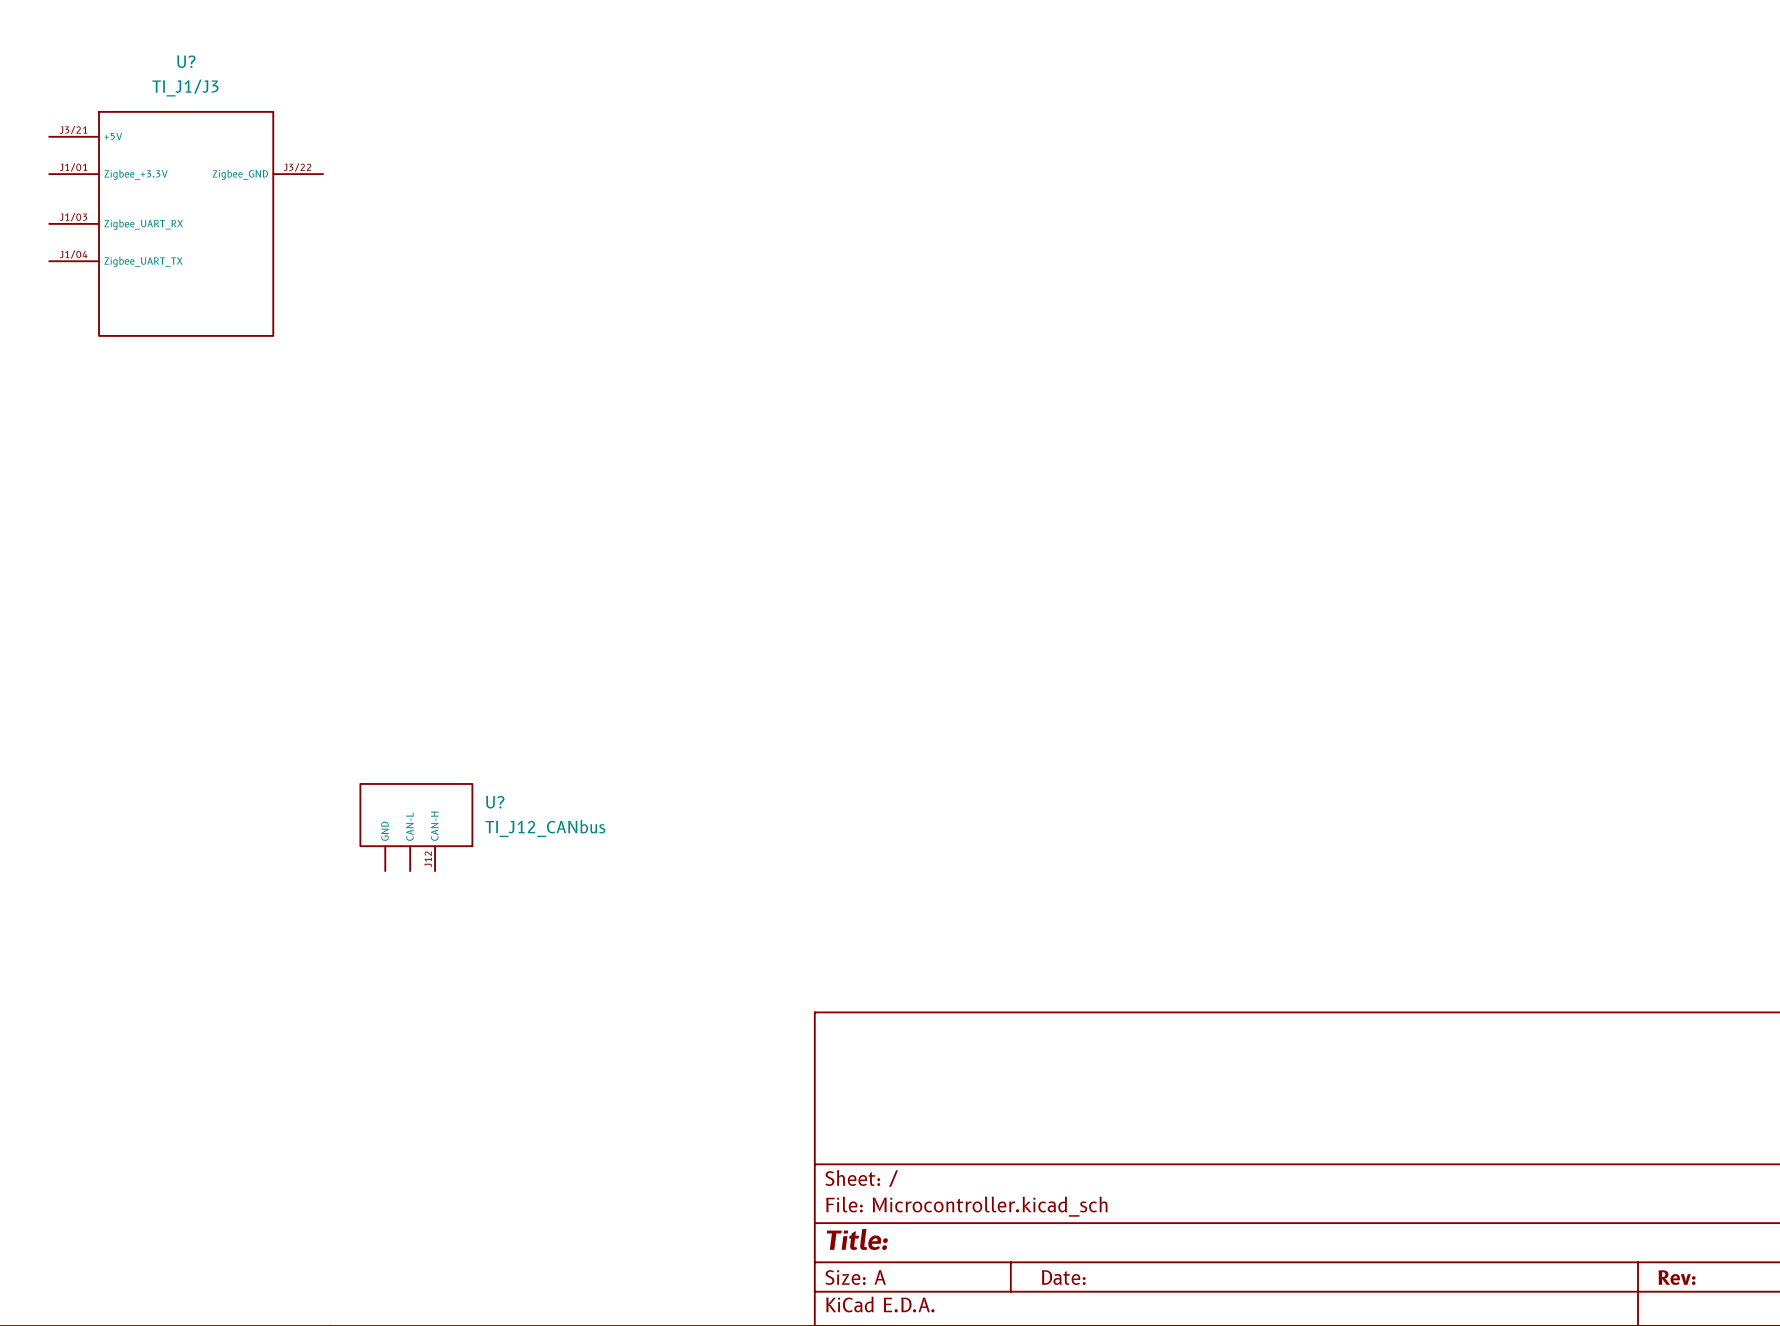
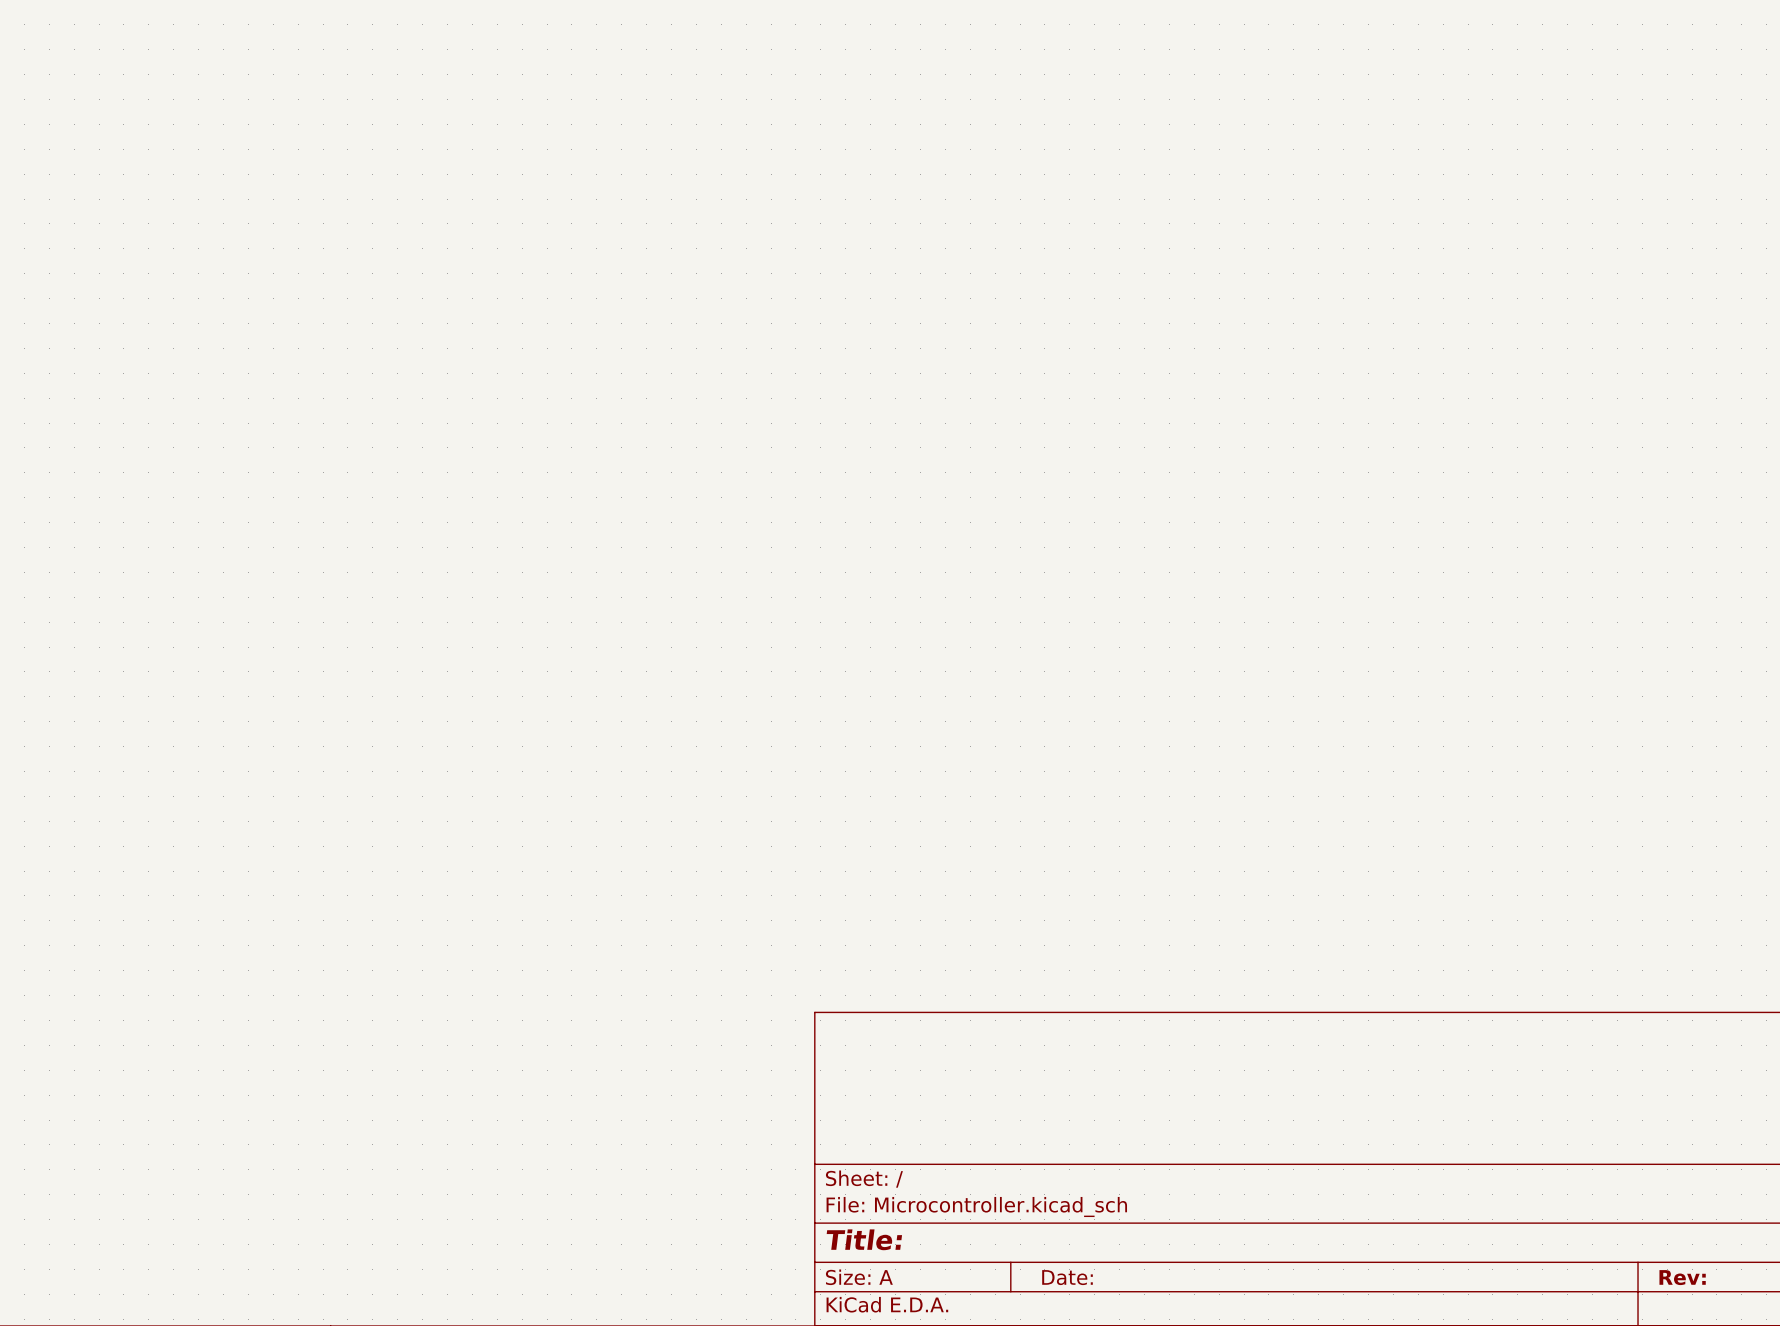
U?: TI_J1/J3 (186, 223) -> none
U?: TI_J12_CANbus (416, 827) -> none

